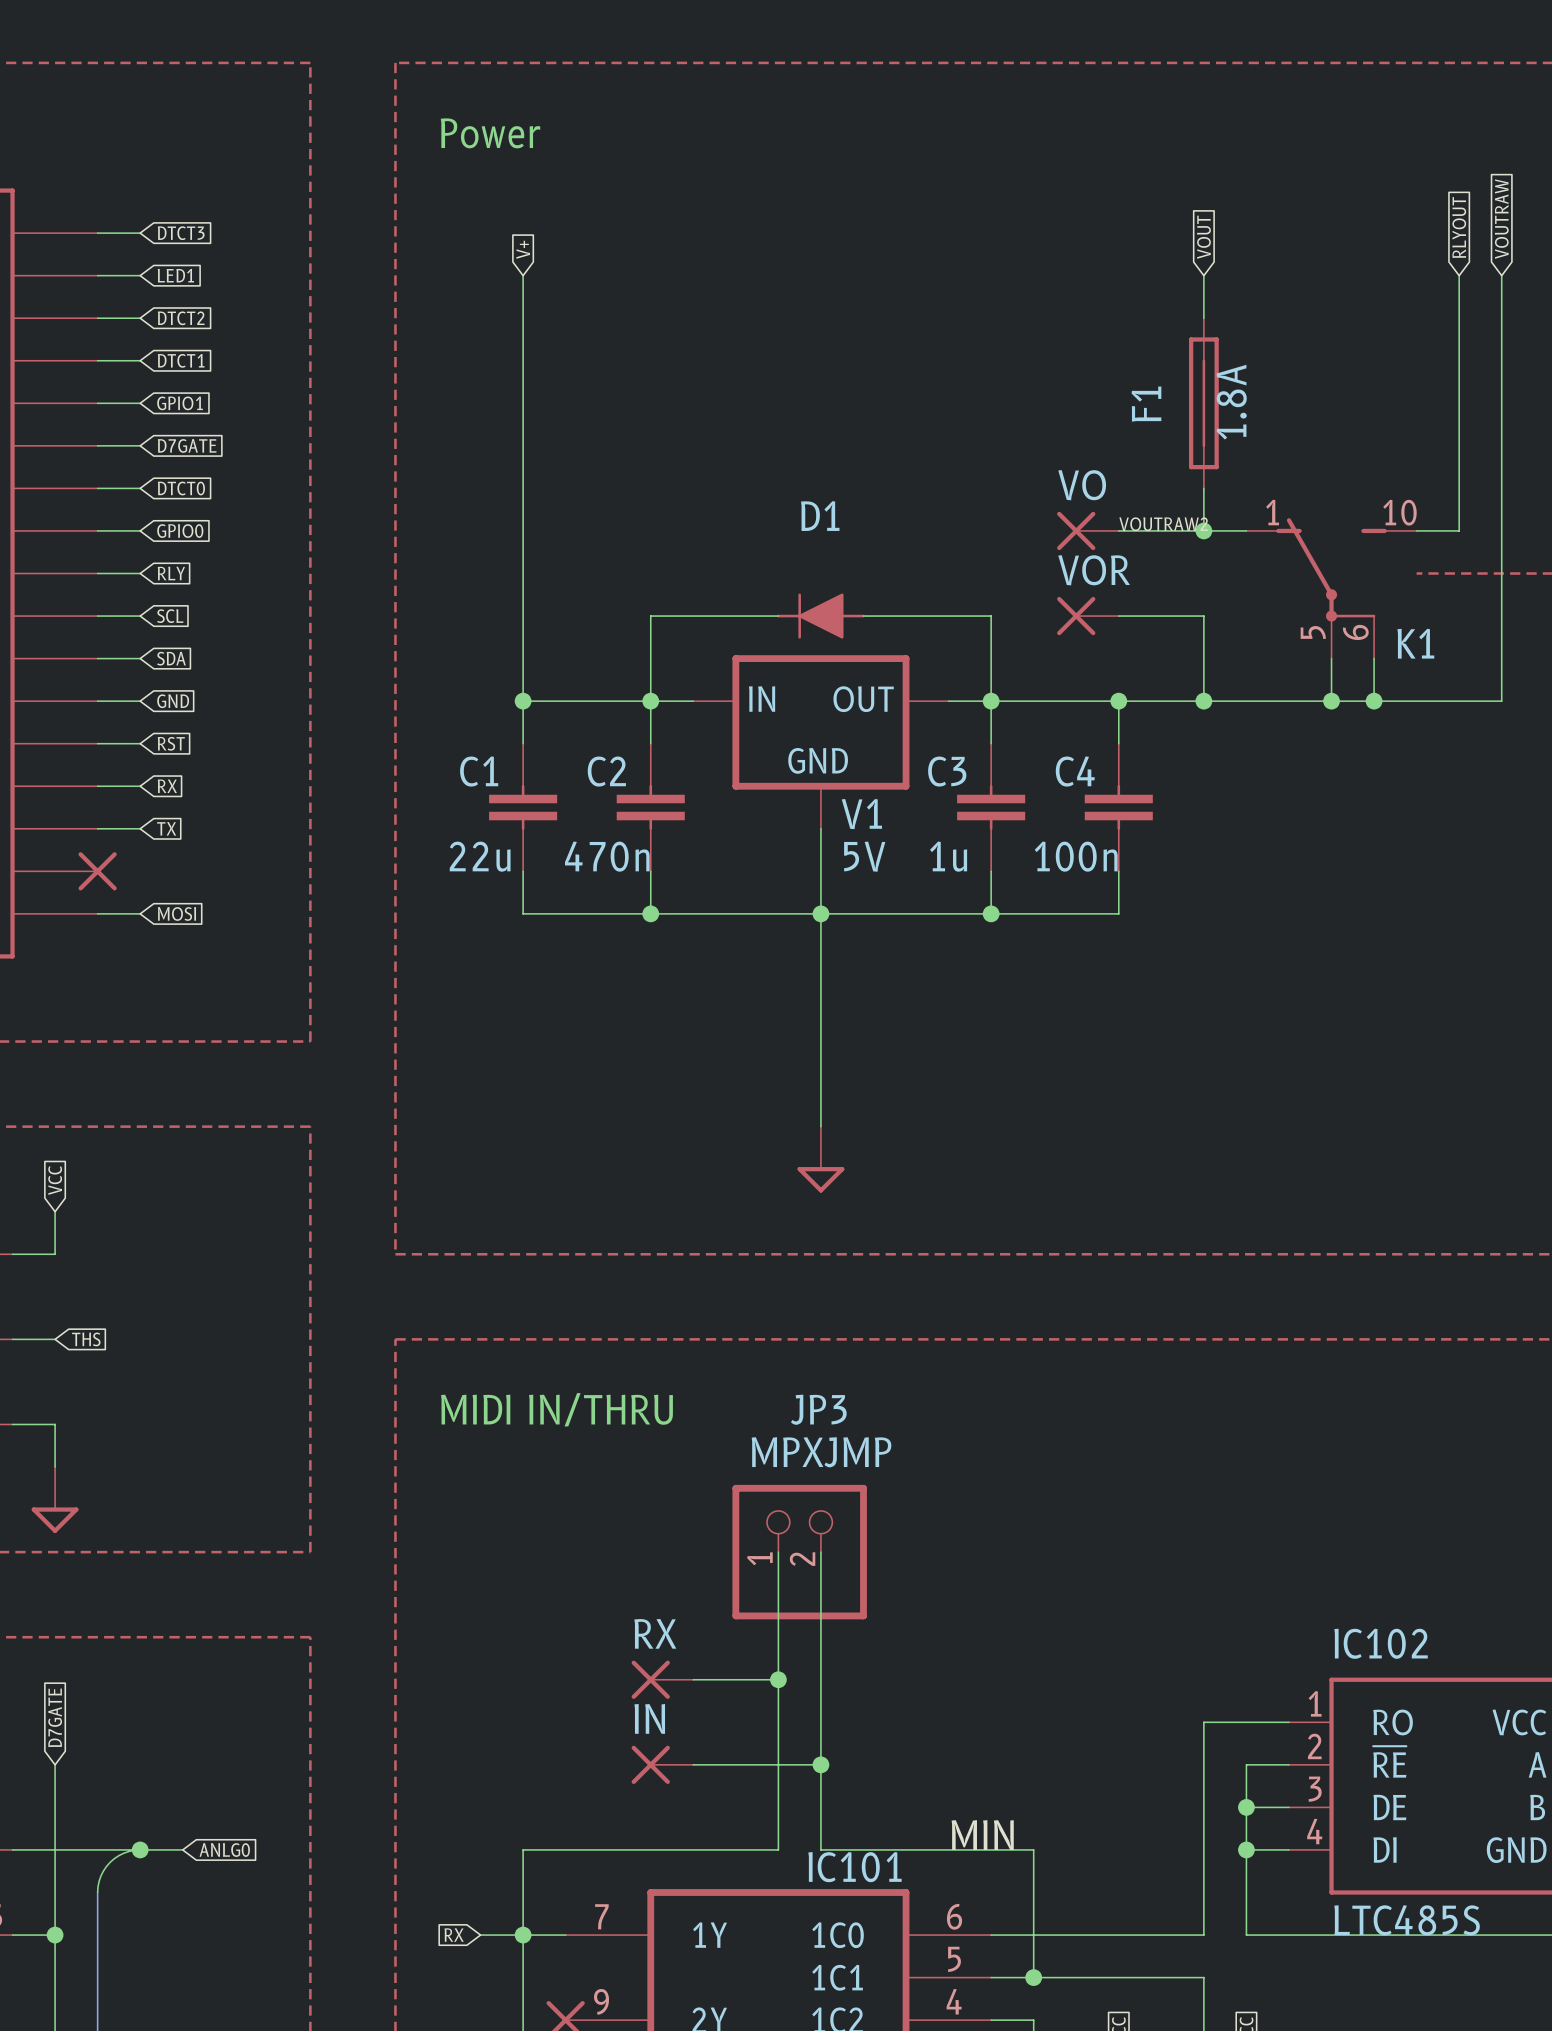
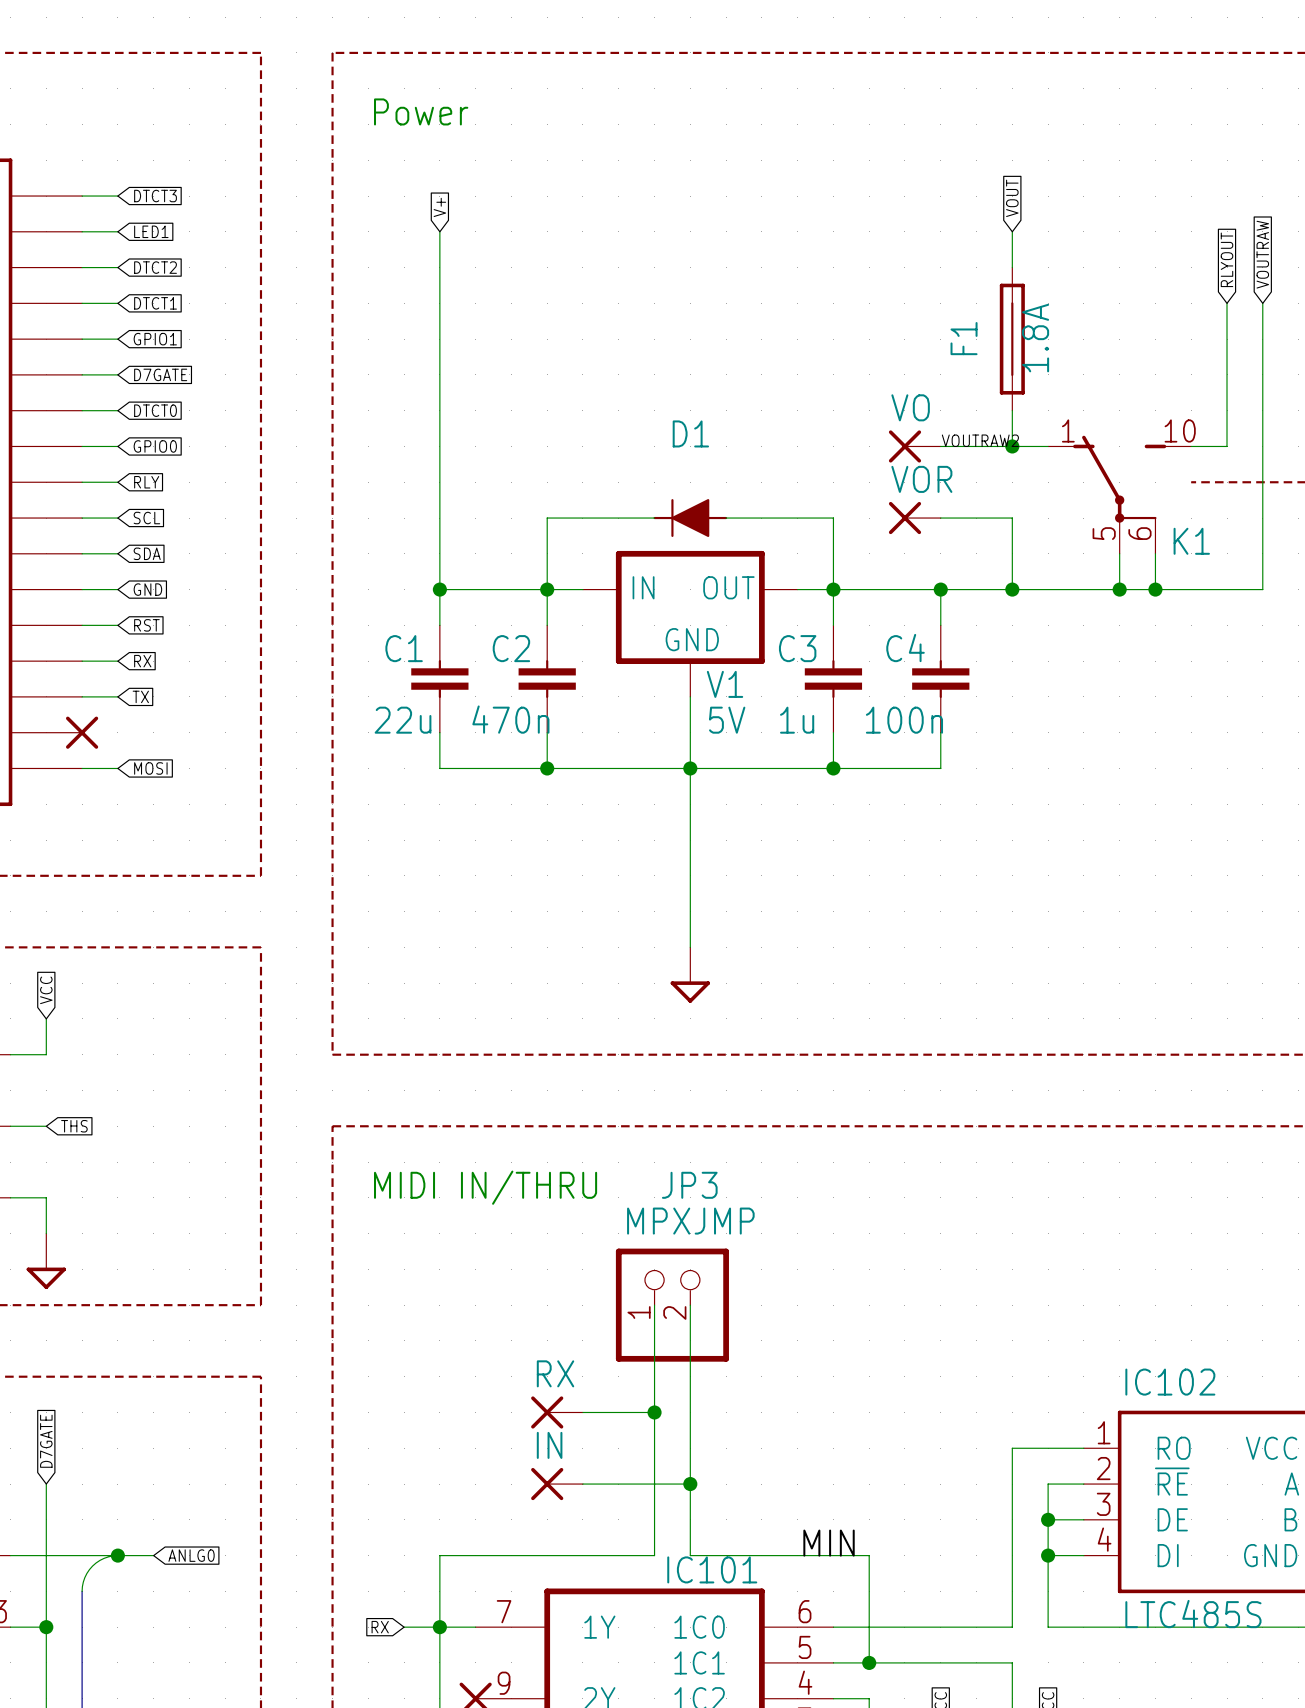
global label position: VOUTRAW (1501, 219) -> VOUTRAW (1262, 254)
global label position: RLYOUT (1459, 227) -> RLYOUT (1227, 259)
wire: (1459, 275) (1459, 360) -> none
wire: (1501, 275) (1501, 360) -> none

